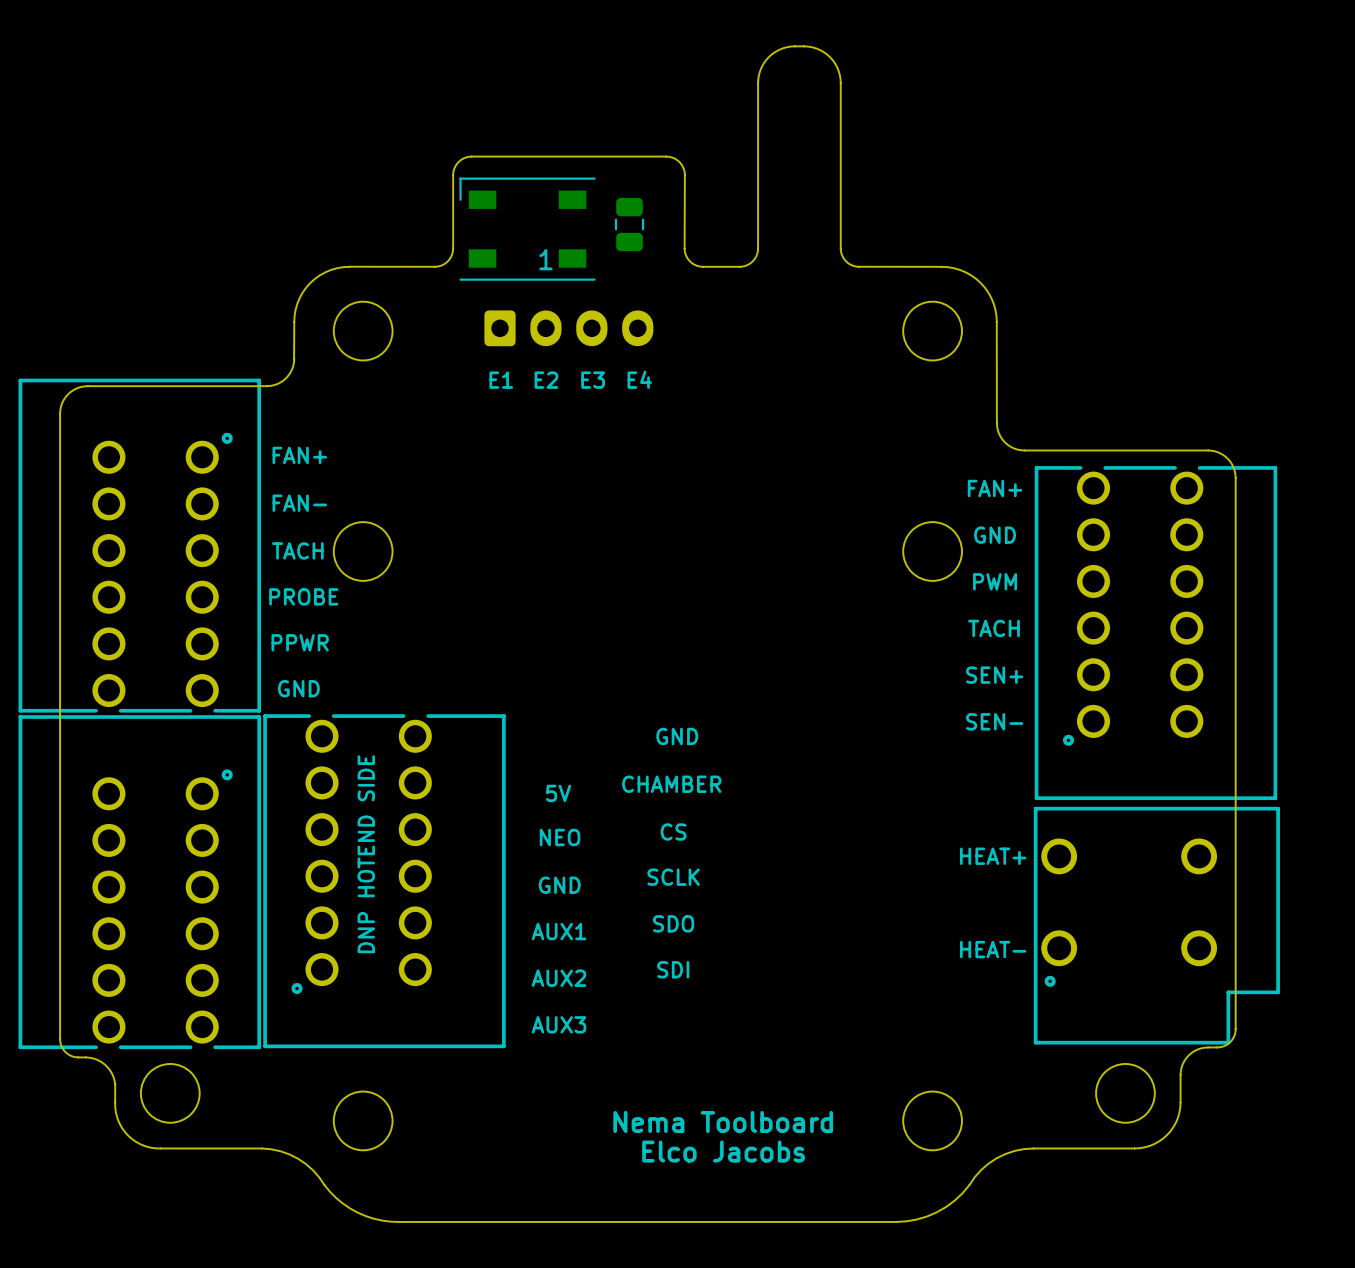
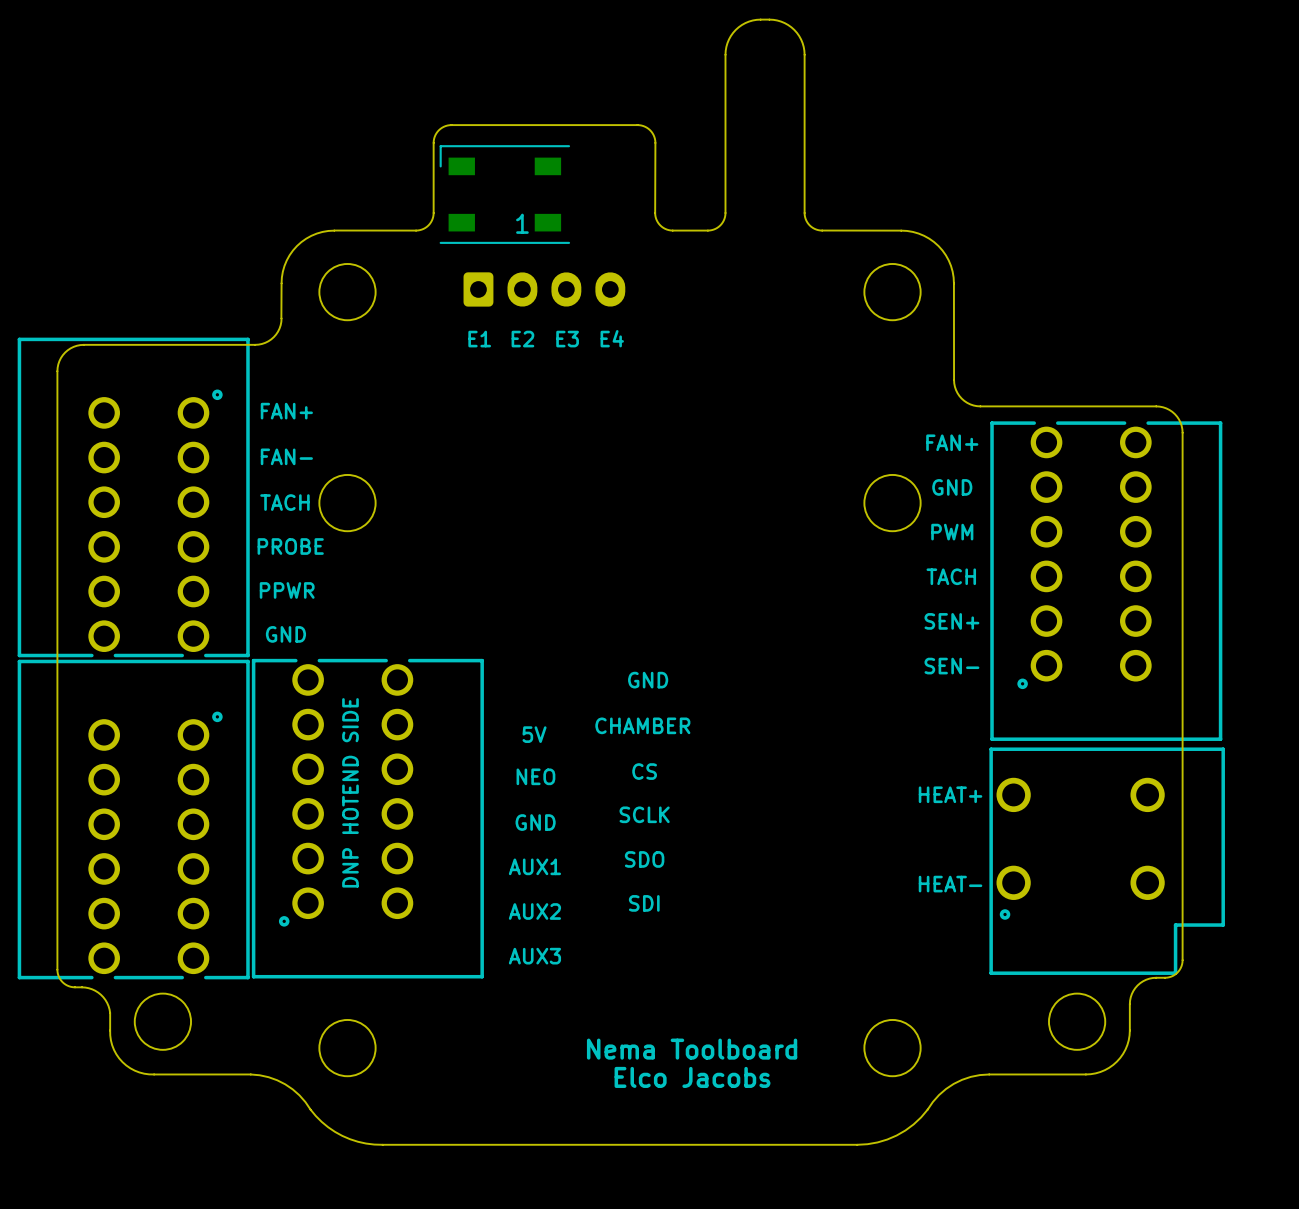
part: (629, 224) -> none

